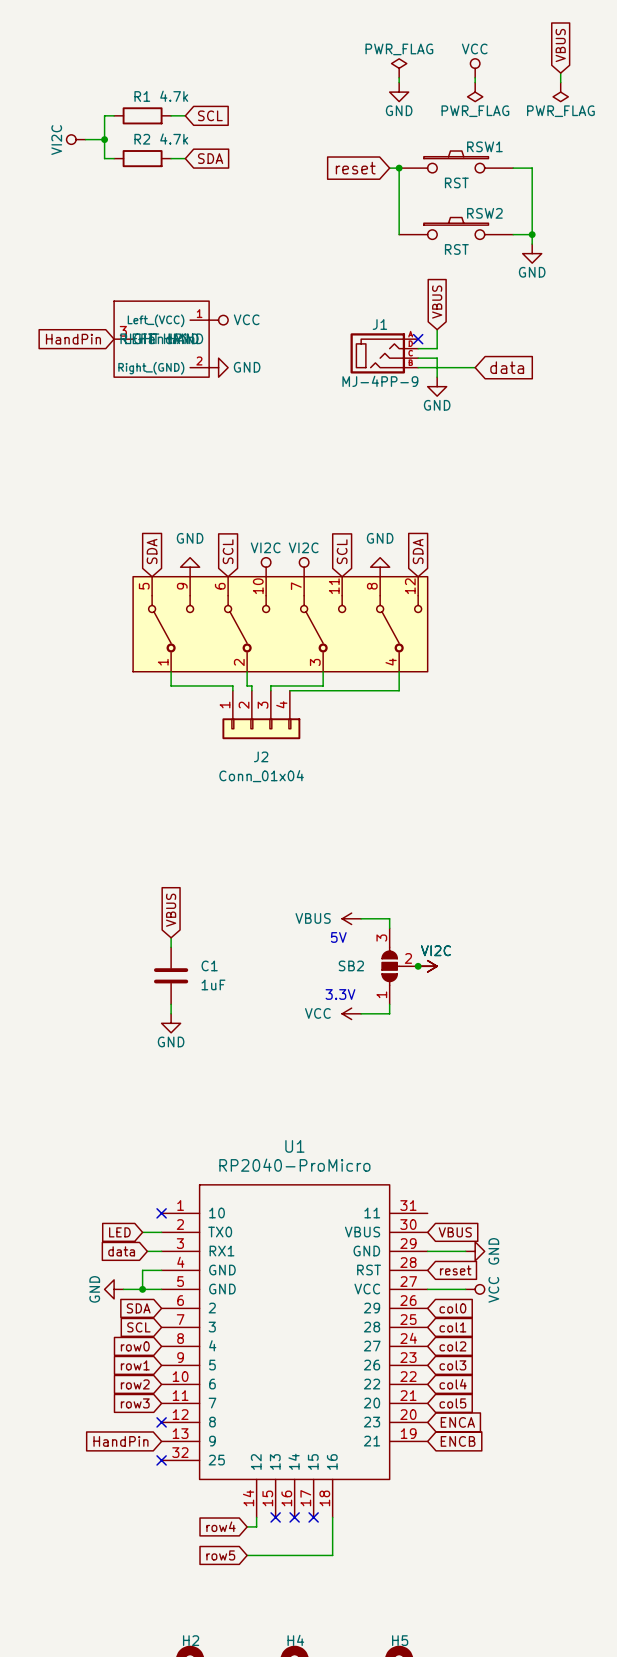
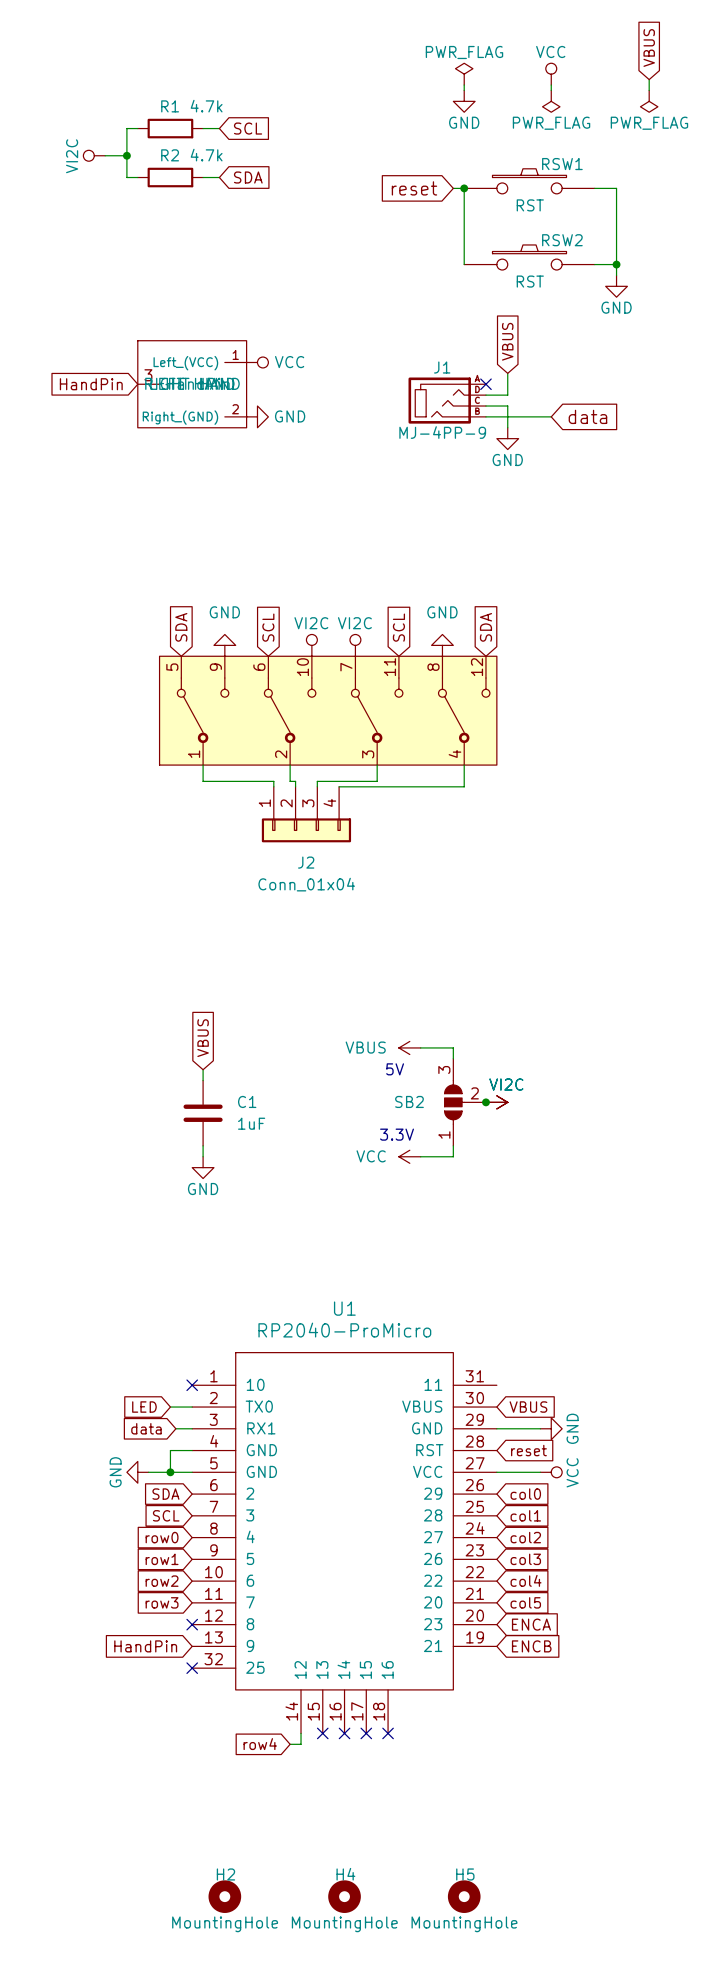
wire: (332, 1517) (332, 1555) (247, 1555) -> none
no-connect mark: none -> (388, 1733)
global label: row5 (220, 1555) -> none

